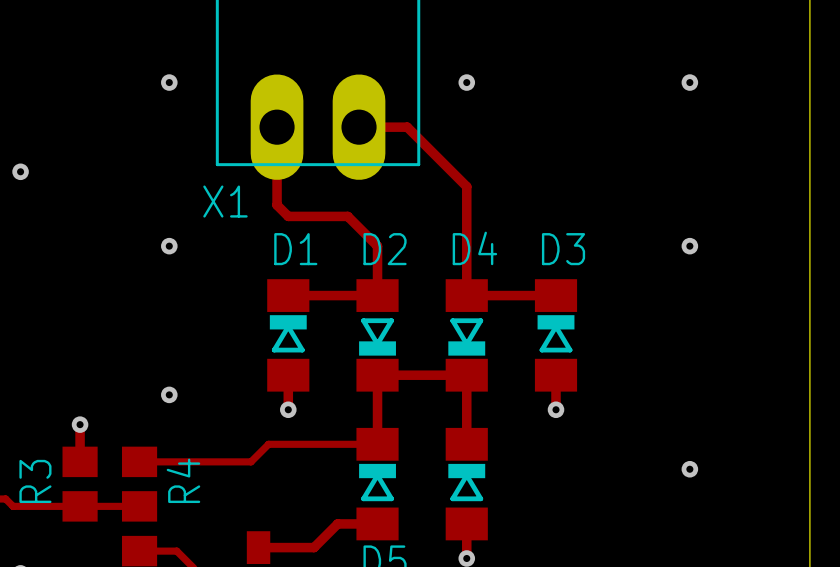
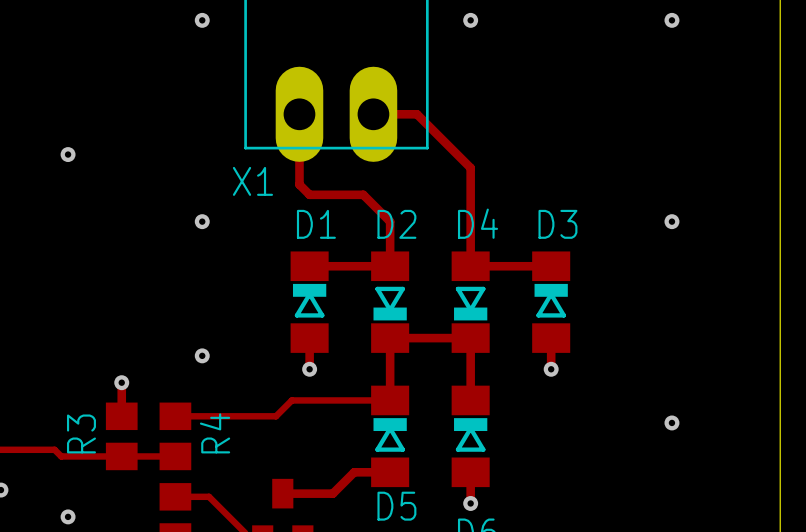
via: none -> (202, 20)
via: none -> (470, 20)
via: none -> (671, 20)
via: (169, 82) -> none
via: (466, 82) -> none
via: (689, 82) -> none

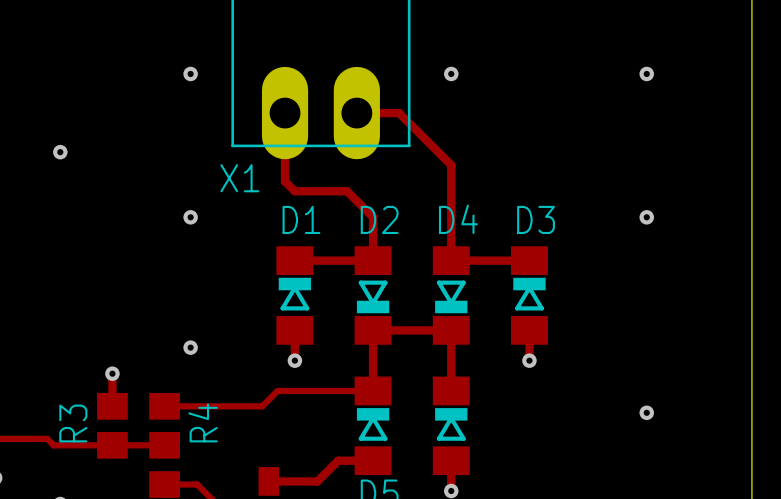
via: (202, 20) -> none
via: (470, 20) -> none
via: (671, 20) -> none
via: none -> (190, 73)
via: none -> (451, 73)
via: none -> (646, 73)

